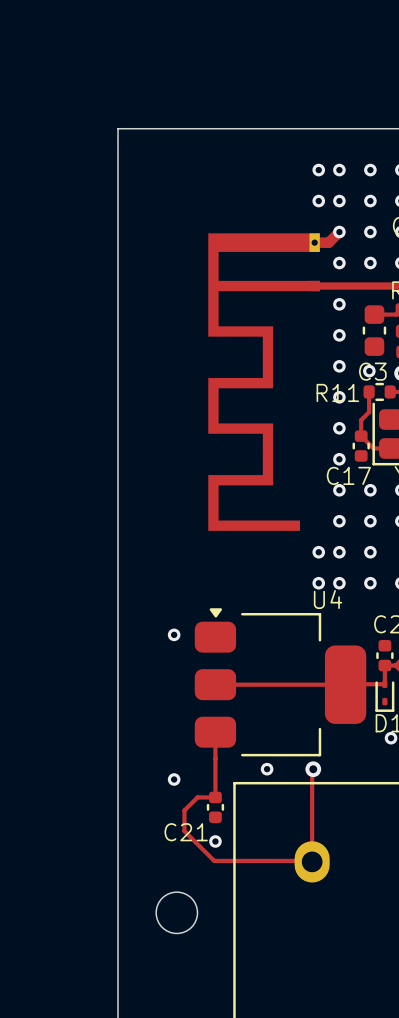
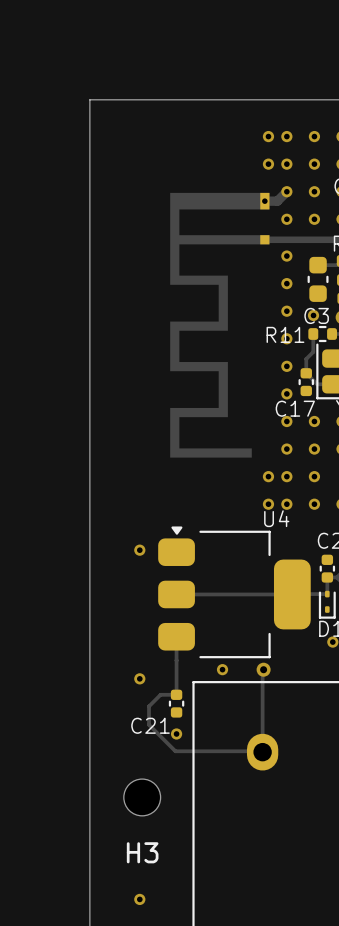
H3 name: none -> H3 (142, 852)

